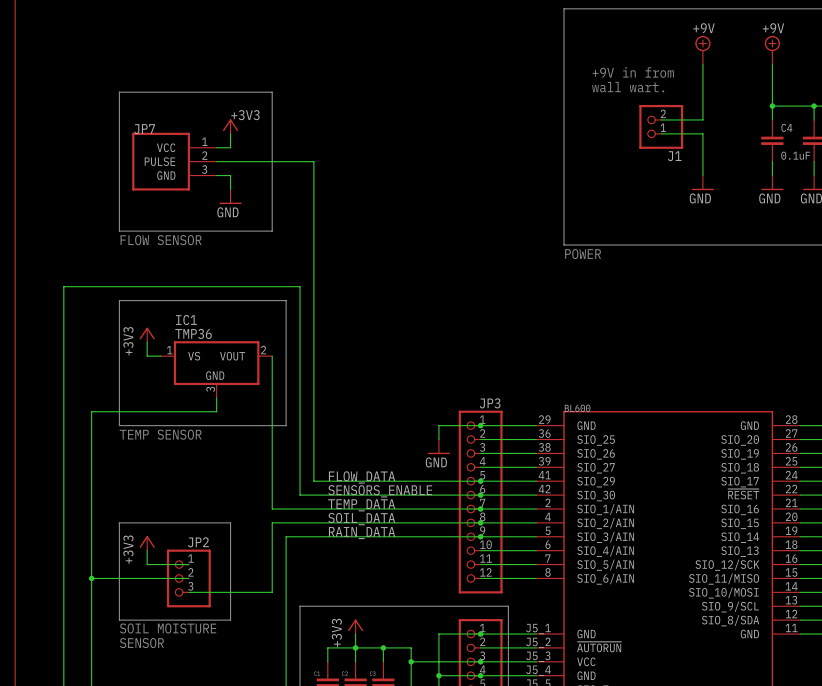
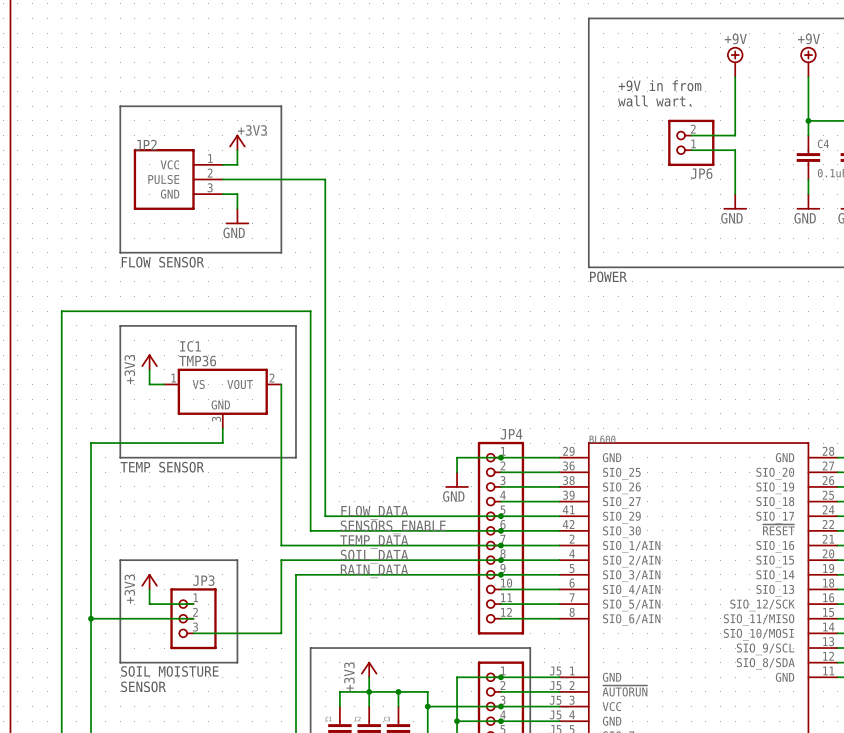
JP7 name: JP7 (144, 129) -> JP2 (146, 145)
J1 name: J1 (674, 156) -> JP6 (701, 173)
JP3 name: JP3 (490, 403) -> JP4 (511, 434)
JP2 name: JP2 (198, 542) -> JP3 (203, 580)

